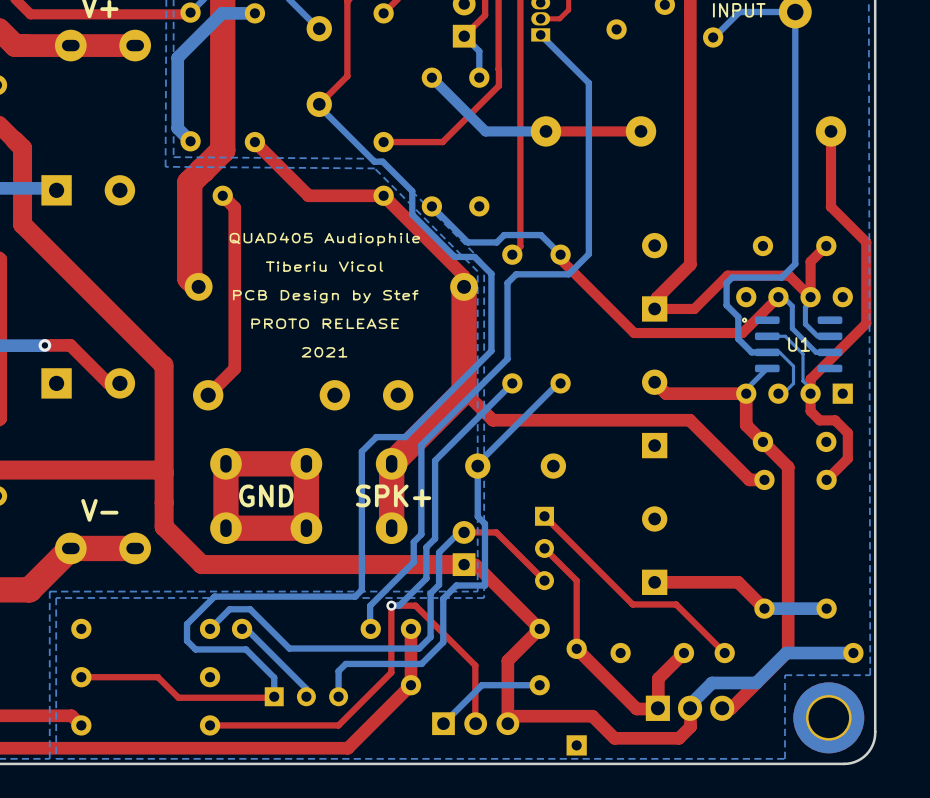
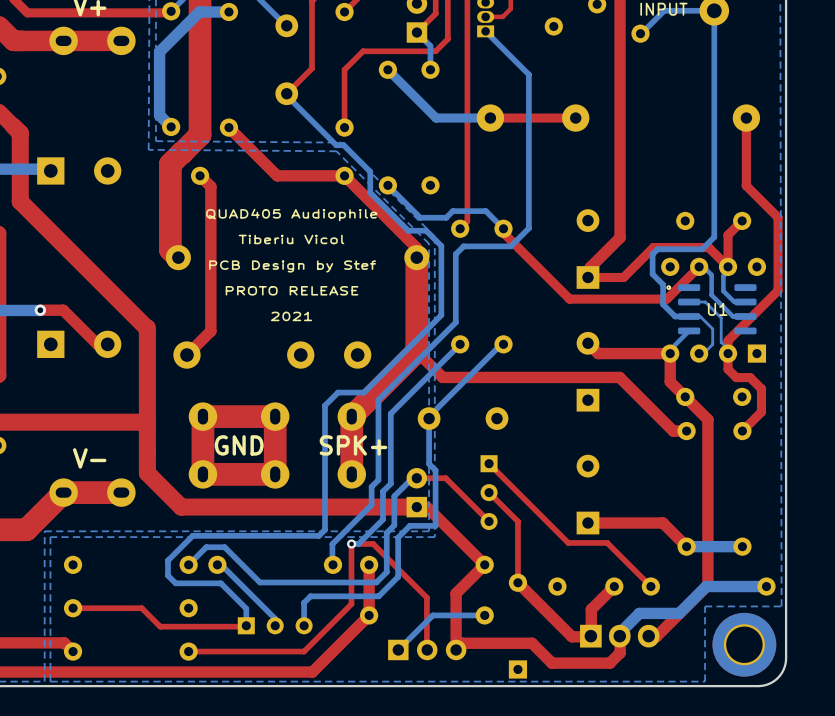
top track: (498, 43) (498, 85) (442, 142) (383, 142) -> (447, 39) (435, 51) (363, 51) (344, 69) (344, 127)

